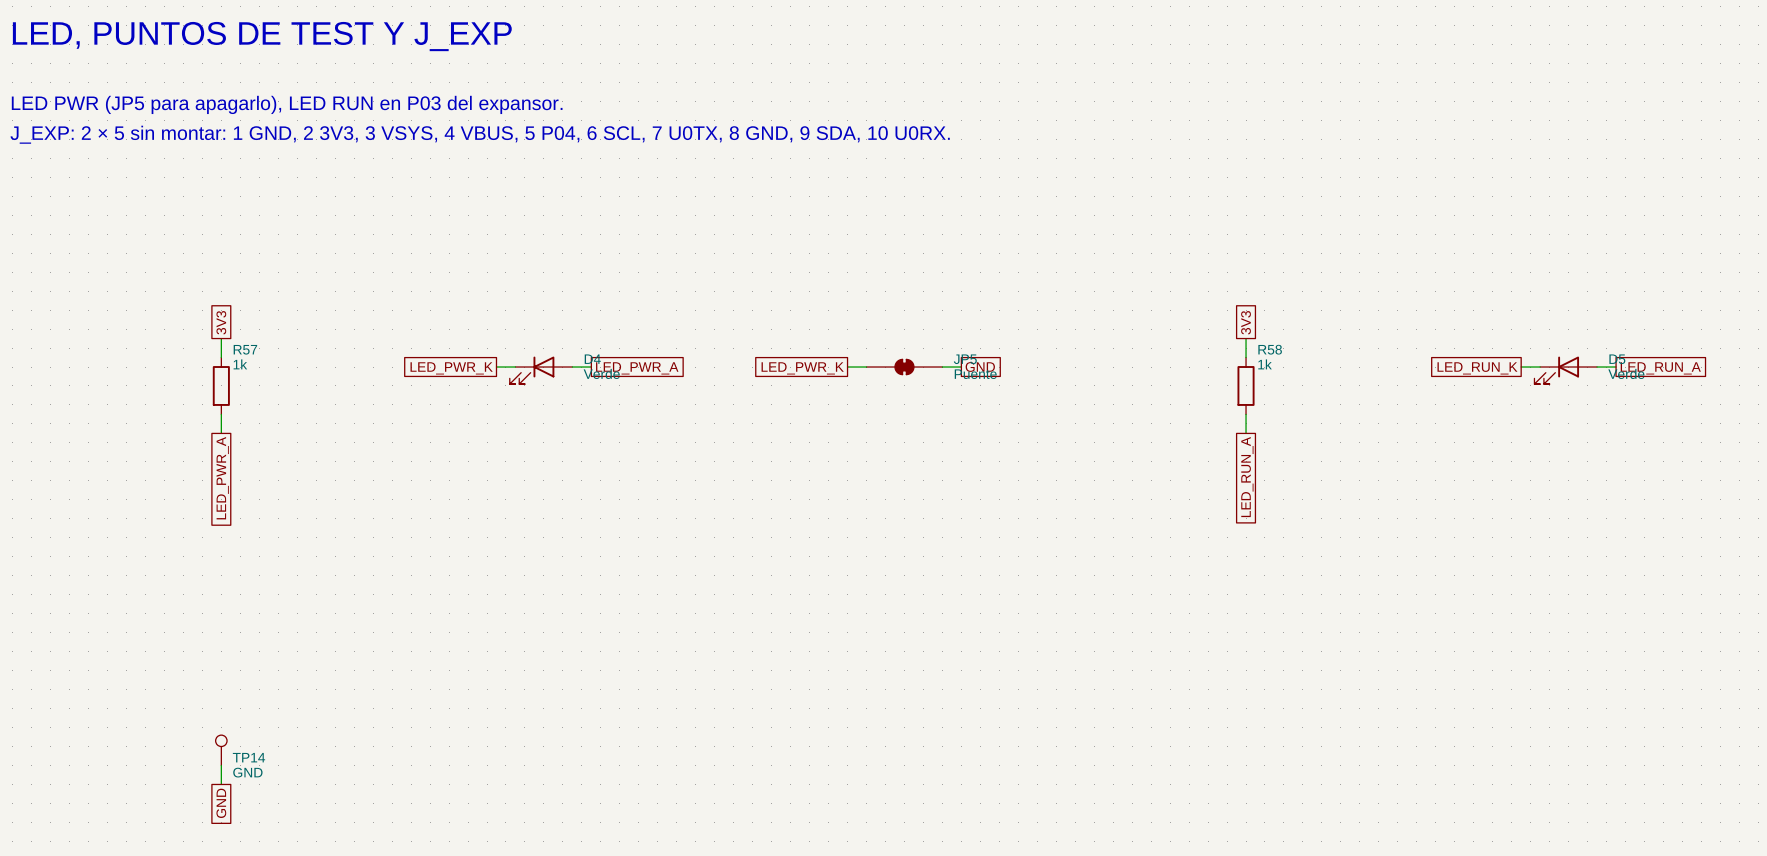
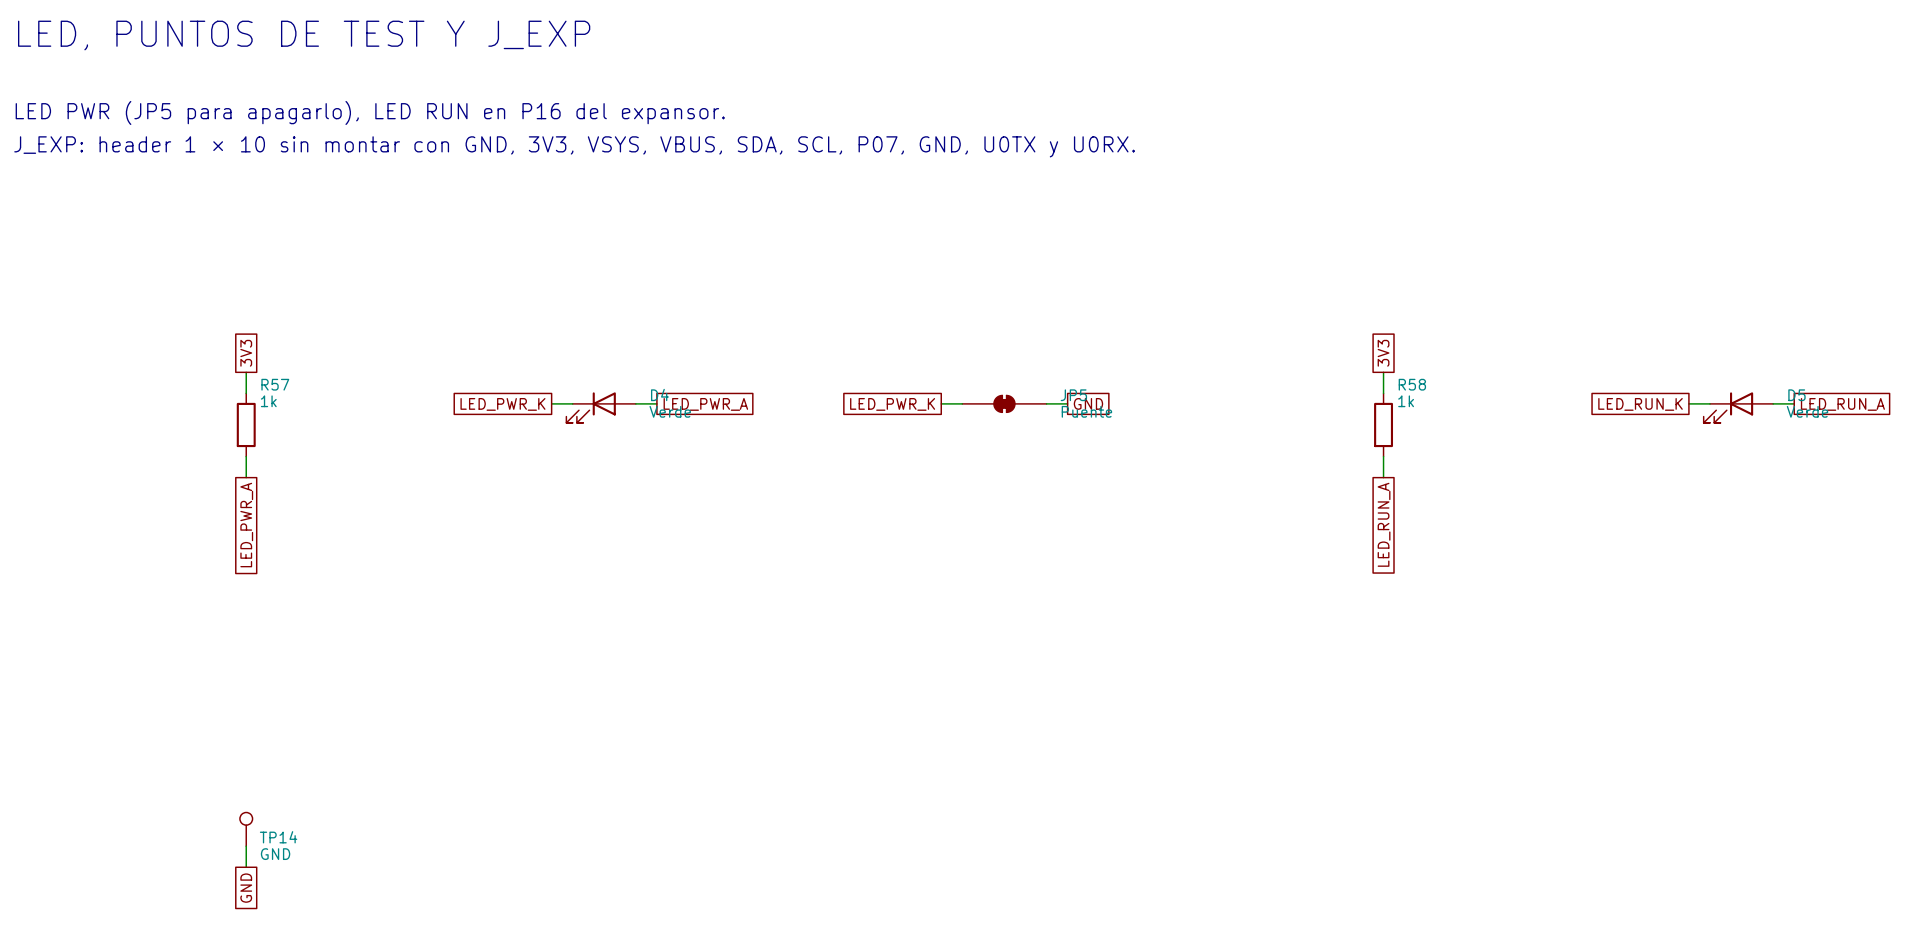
text: LED PWR (JP5 para apagarlo), LED RUN en P03 del expansor. (287, 104) -> LED PWR (JP5 para apagarlo), LED RUN en P16 del expansor. (370, 112)
text: J_EXP: 2 × 5 sin montar: 1 GND, 2 3V3, 3 VSYS, 4 VBUS, 5 P04, 6 SCL, 7 U0TX, 8 GND, 9 SDA, 10 U0RX. (480, 134) -> J_EXP: header 1 × 10 sin montar con GND, 3V3, VSYS, VBUS, SDA, SCL, P07, GND, U0TX y U0RX. (574, 146)

